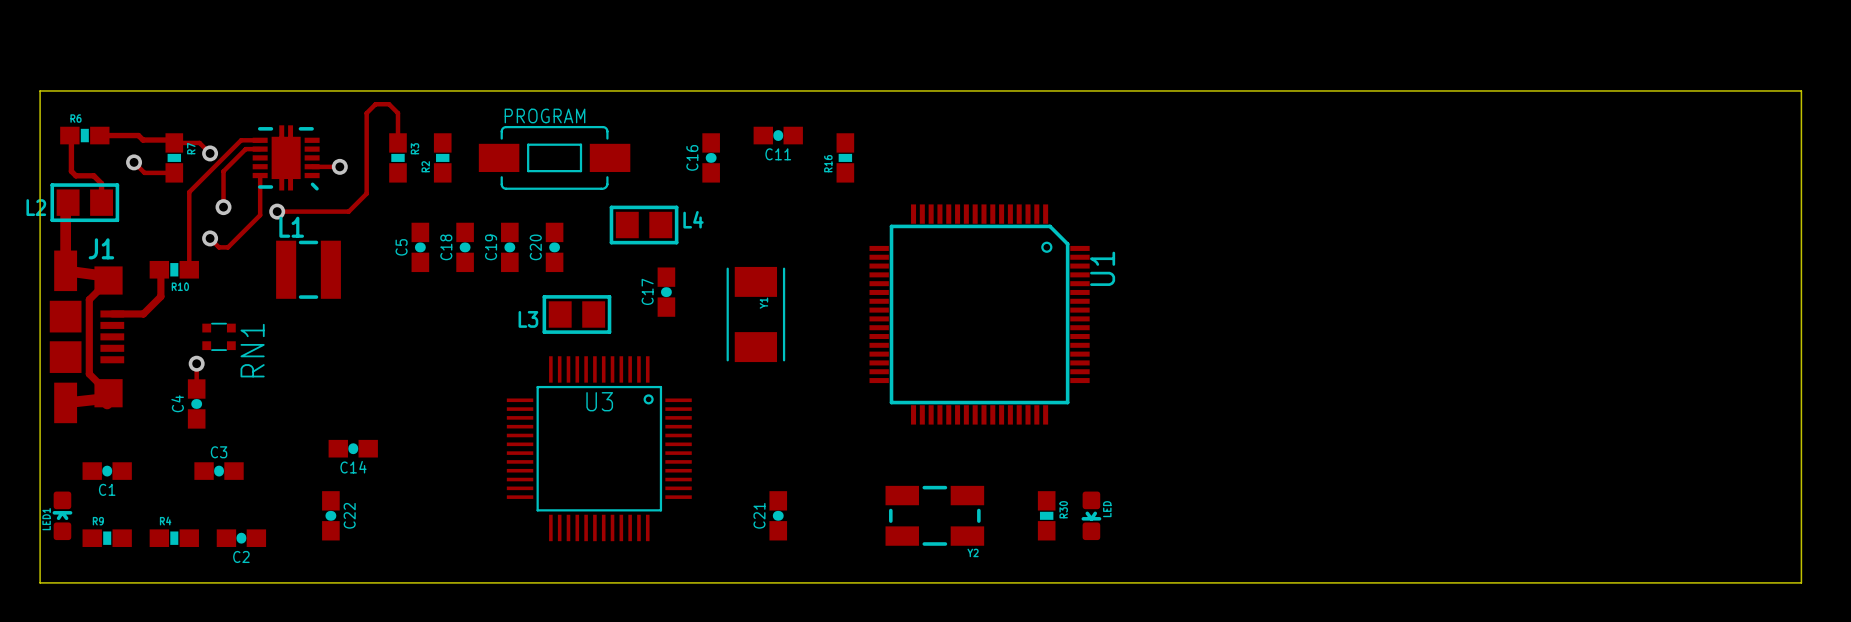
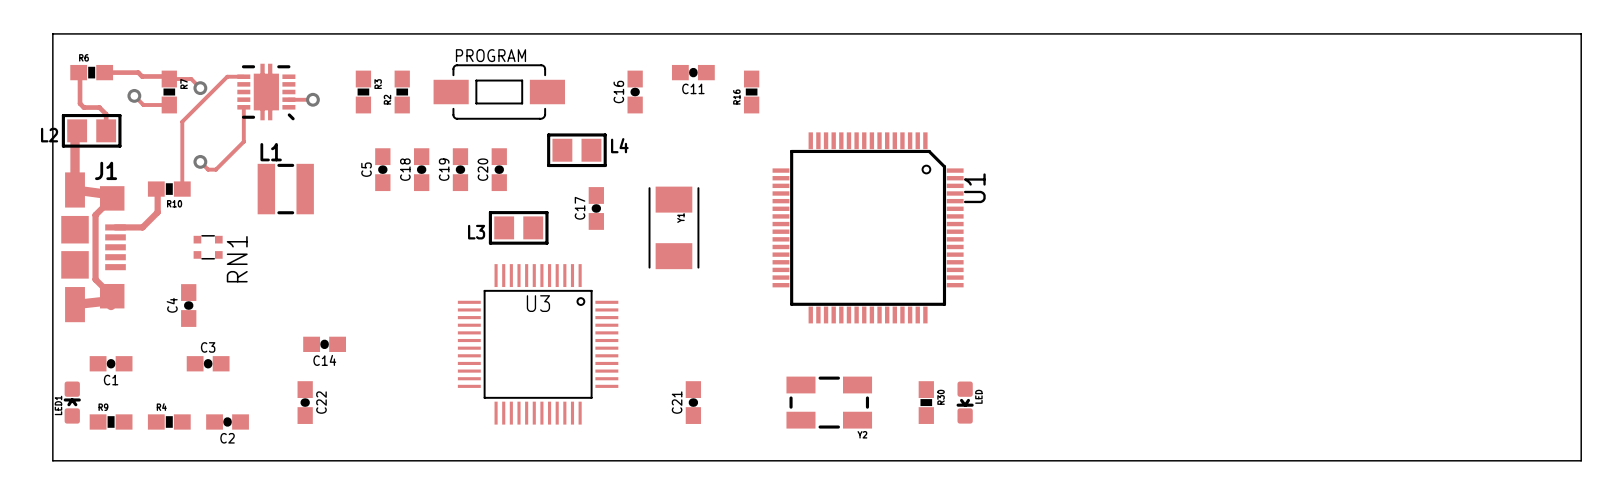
track: (397, 142) (397, 113) (389, 104) (375, 104) (366, 113) (366, 193) (348, 211) (277, 211) -> none
track: (260, 149) (245, 149) (223, 171) (223, 207) -> none
via: (223, 207) -> none
via: (277, 211) -> none
track: (196, 363) (196, 381) -> none
via: (196, 363) -> none

